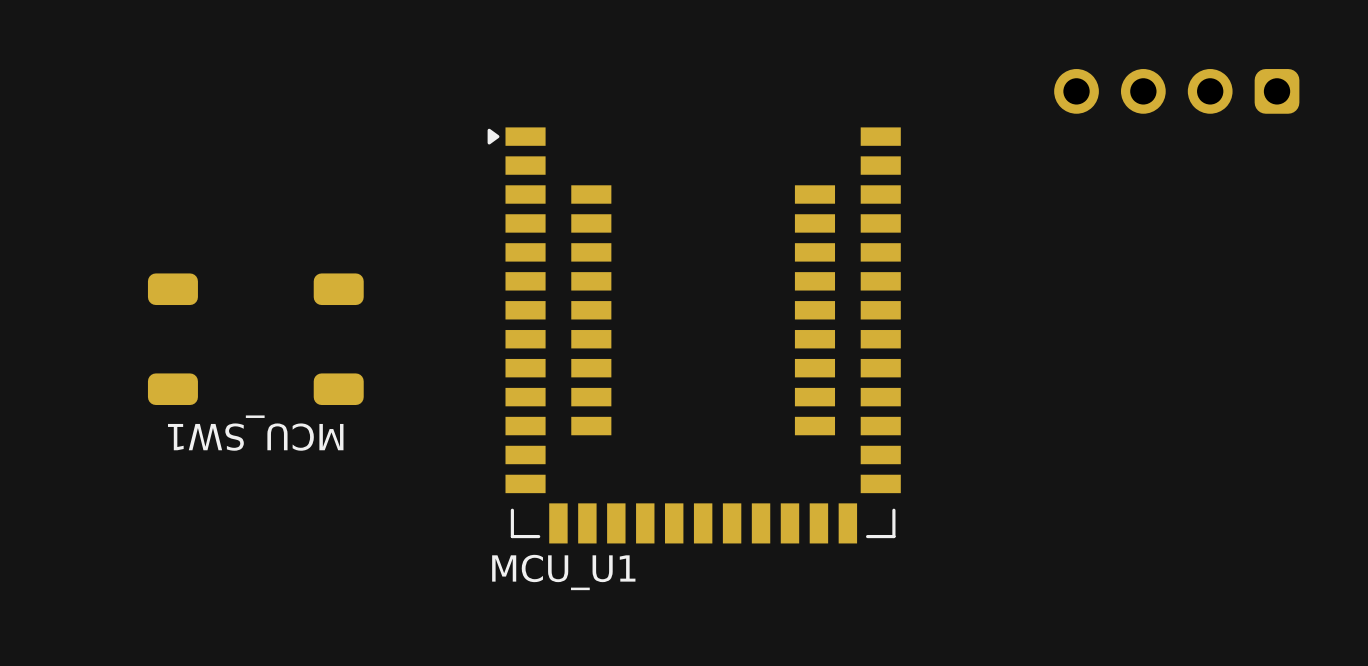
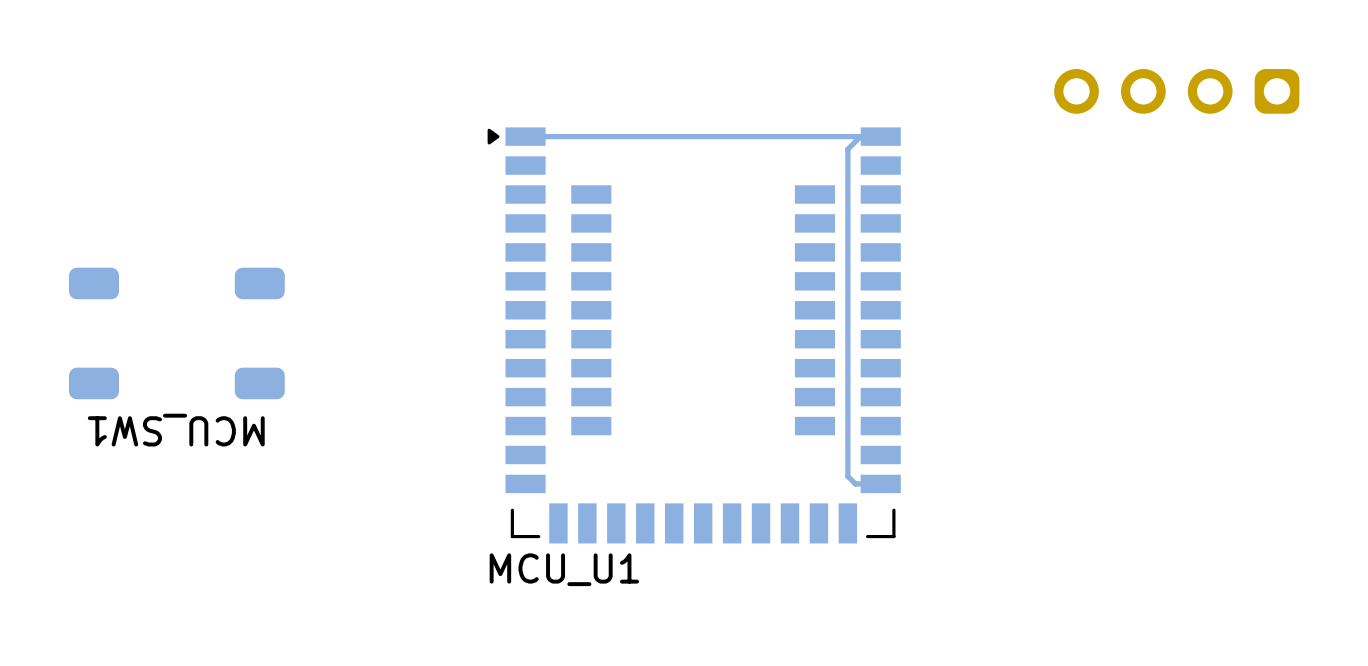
track: none -> (860, 136) (847, 149) (847, 476) (855, 483) (880, 483)
track: none -> (880, 136) (525, 136)
MCU_SW1 position: (255, 339) -> (176, 333)

